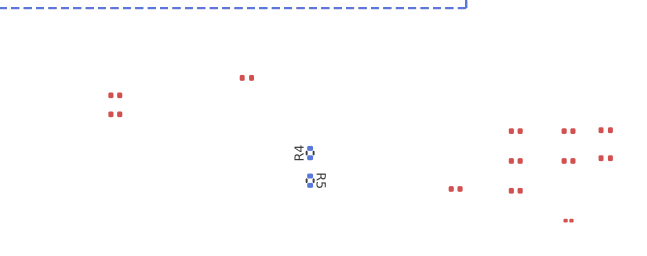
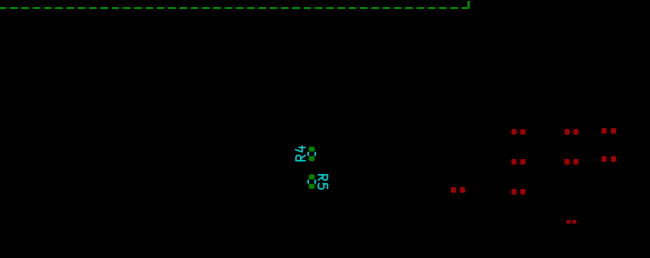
part: (246, 77) -> none
part: (115, 95) -> none
part: (115, 114) -> none

